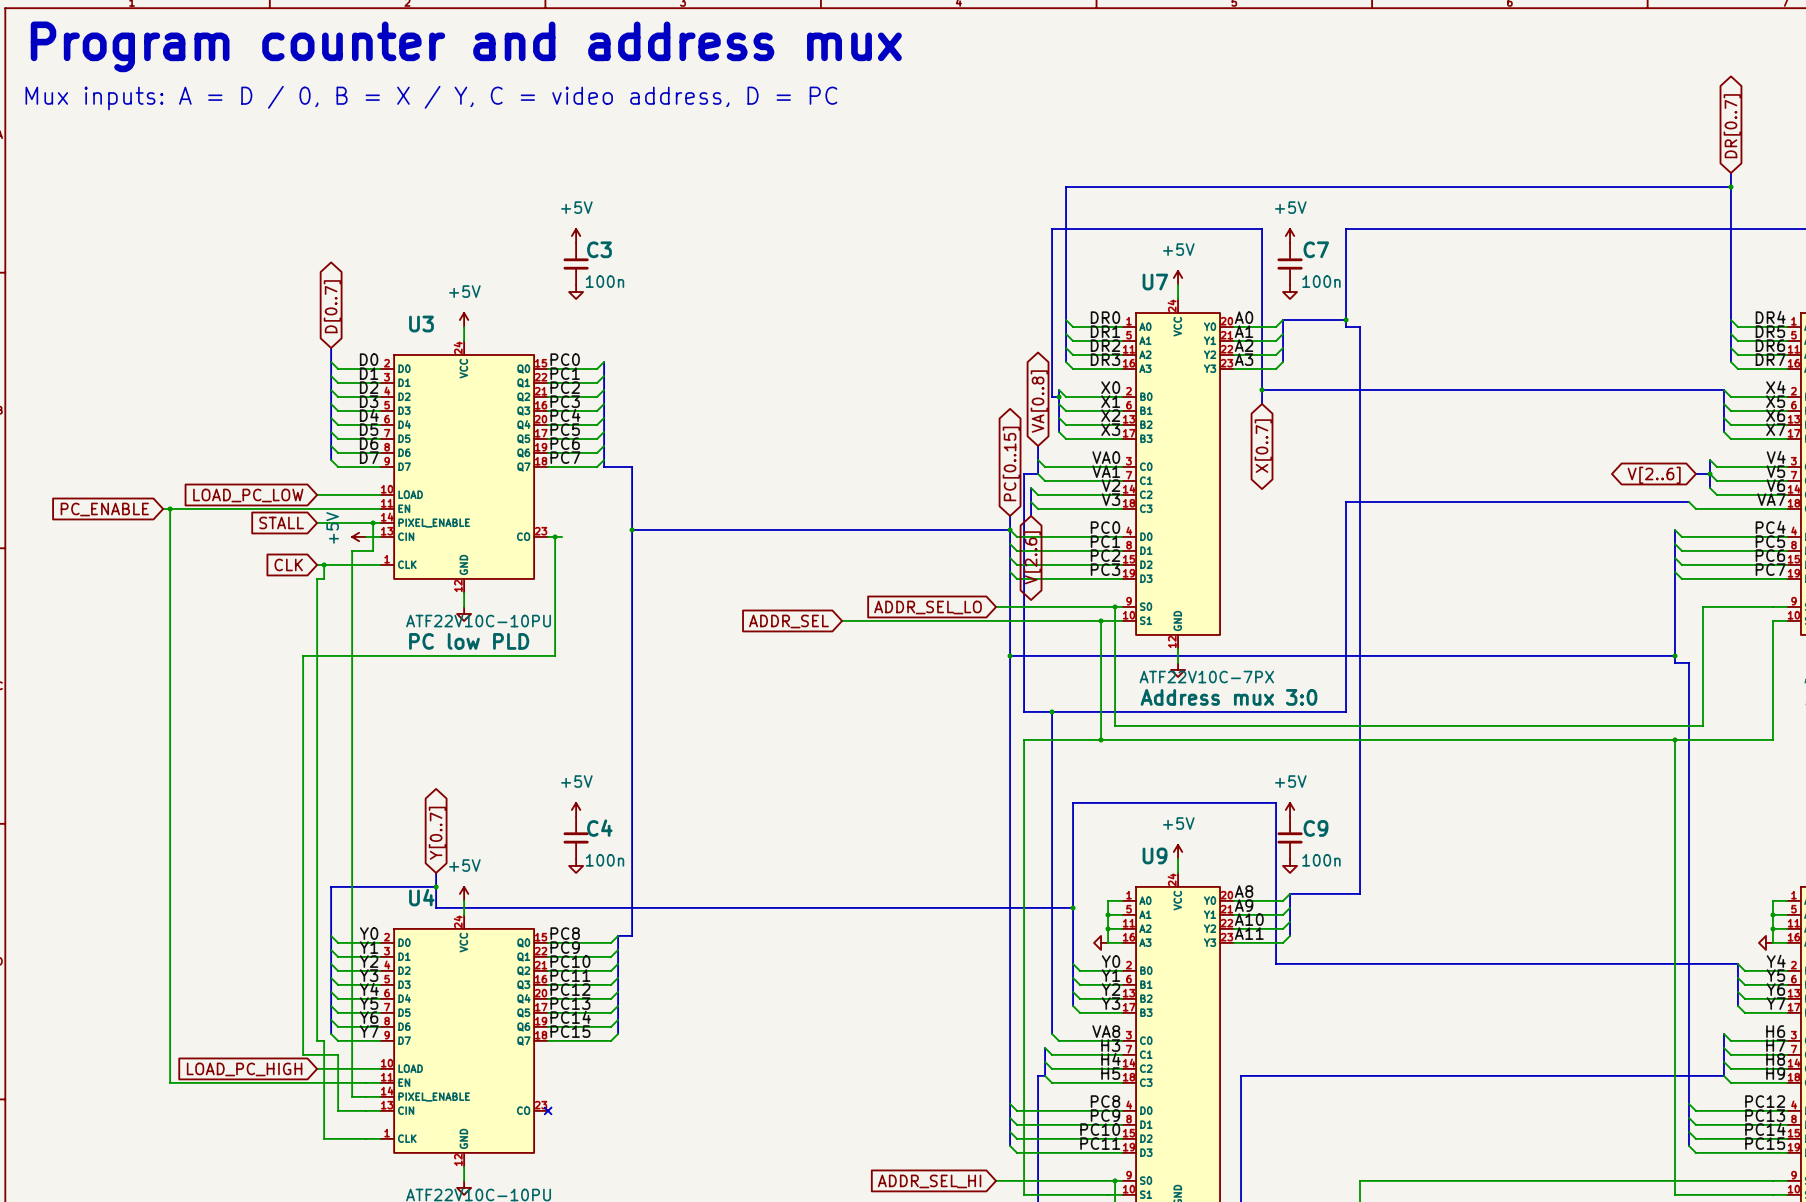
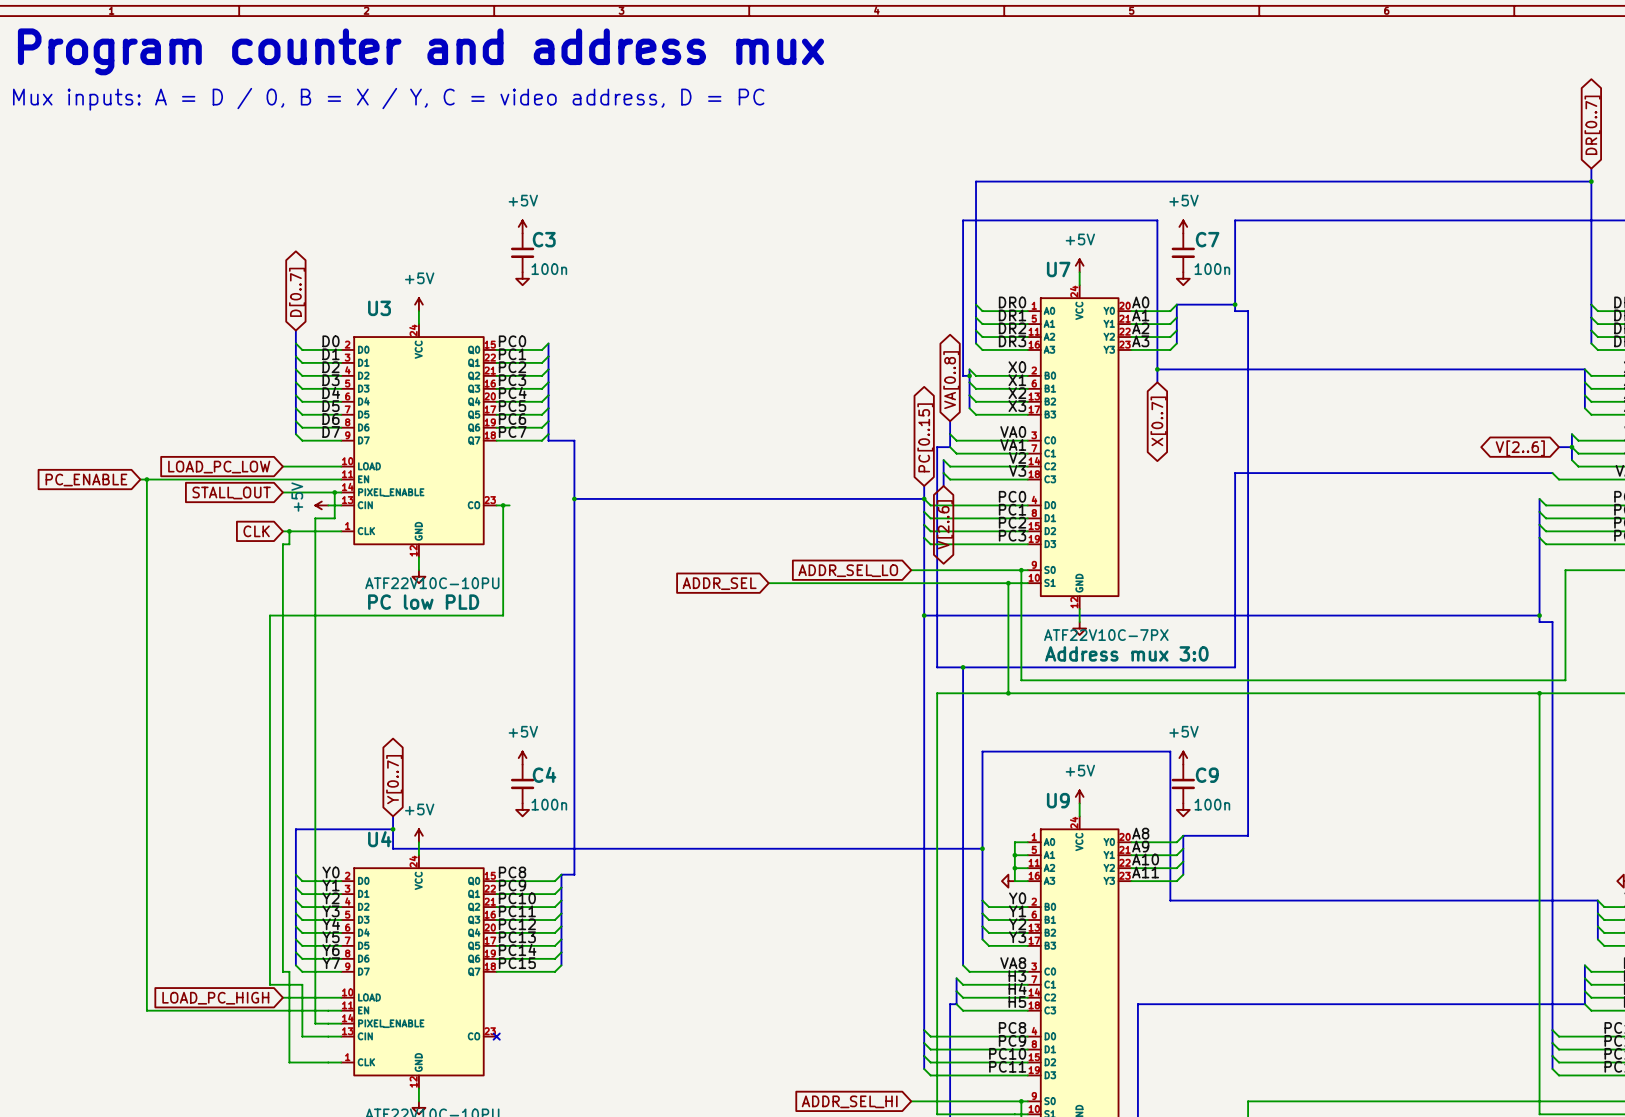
global label: STALL (281, 522) -> STALL_OUT (231, 492)

